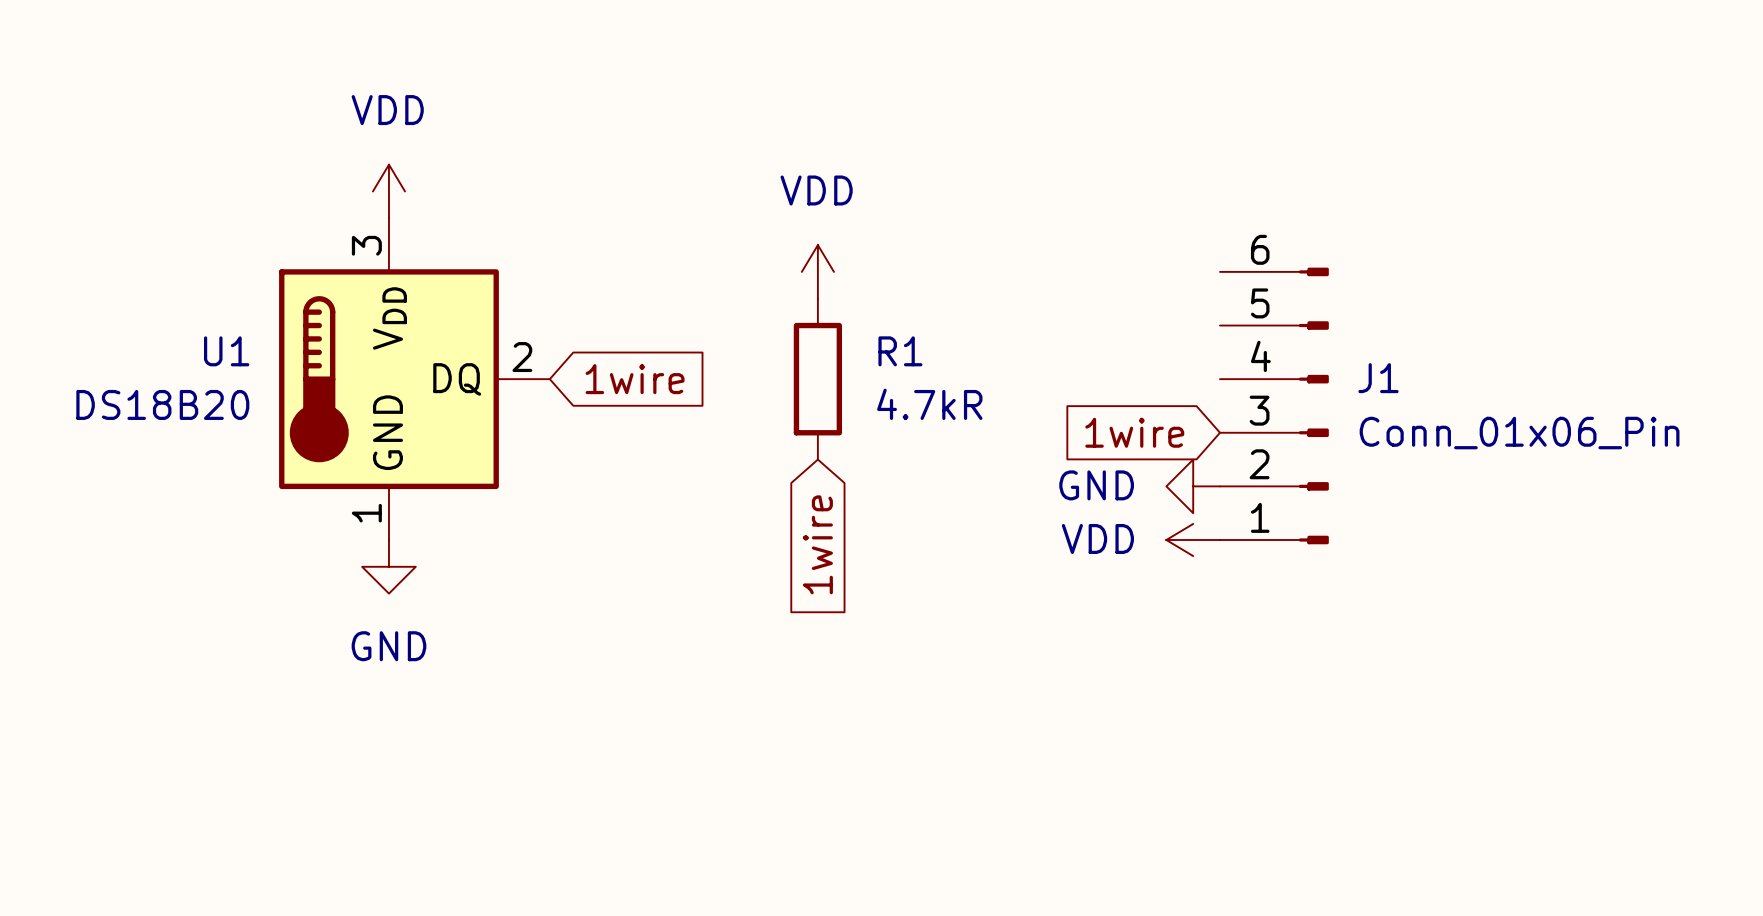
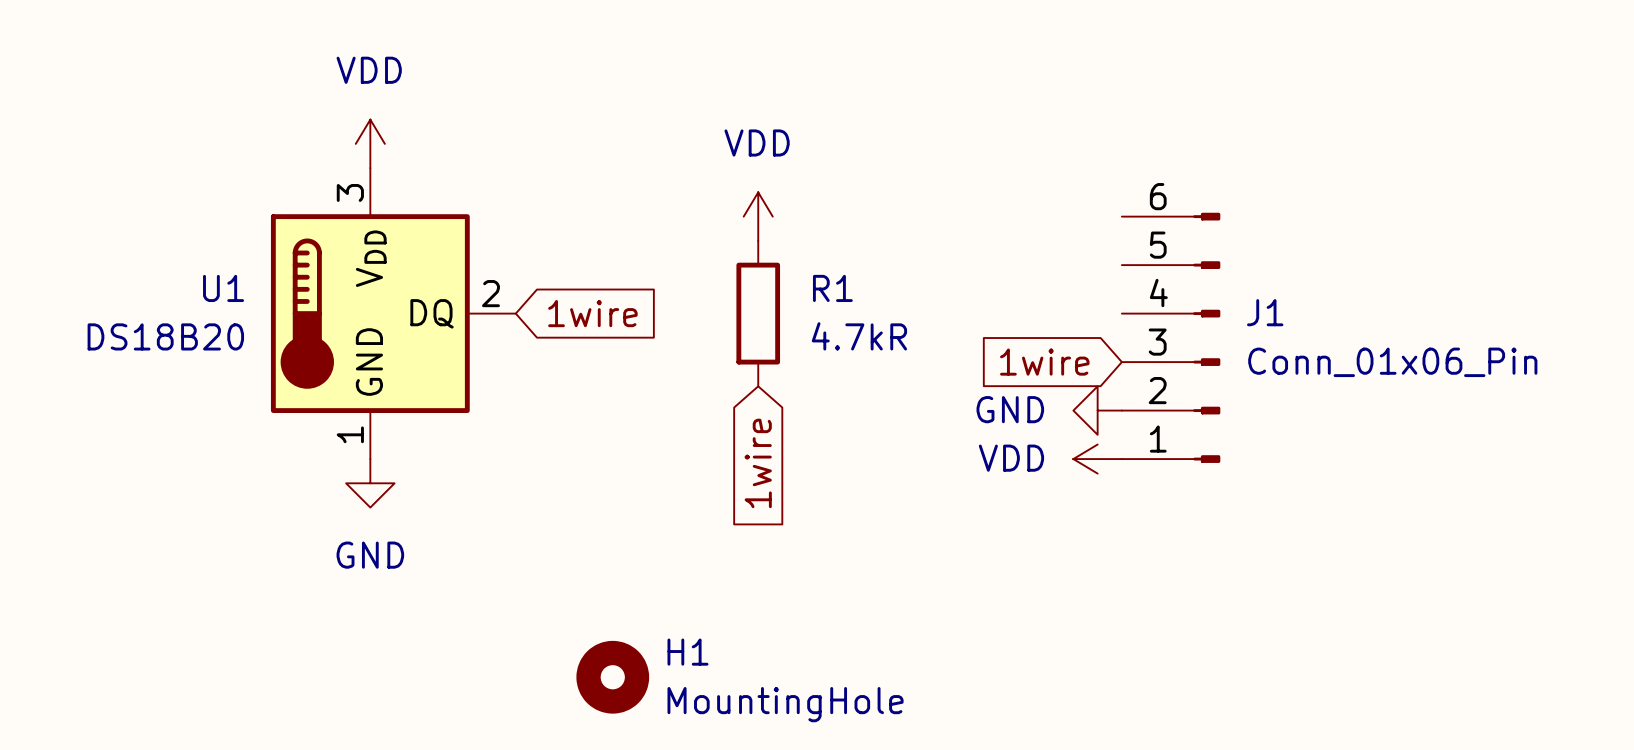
H1: none -> MountingHole (612, 677)

